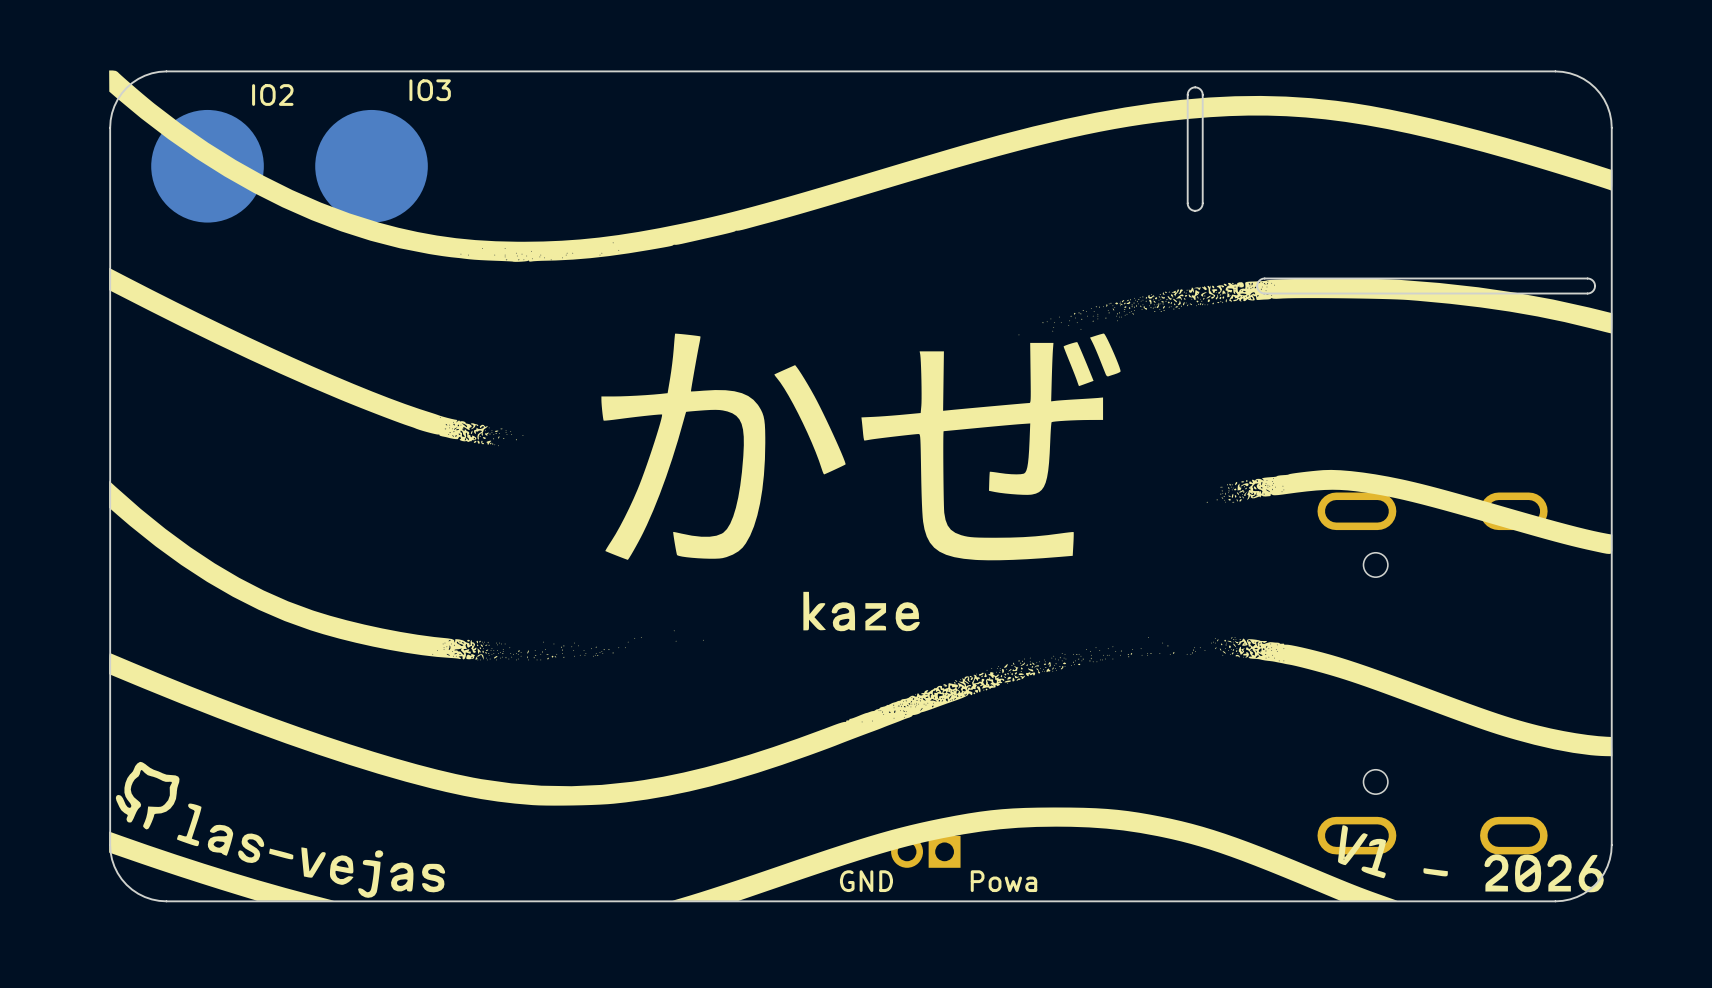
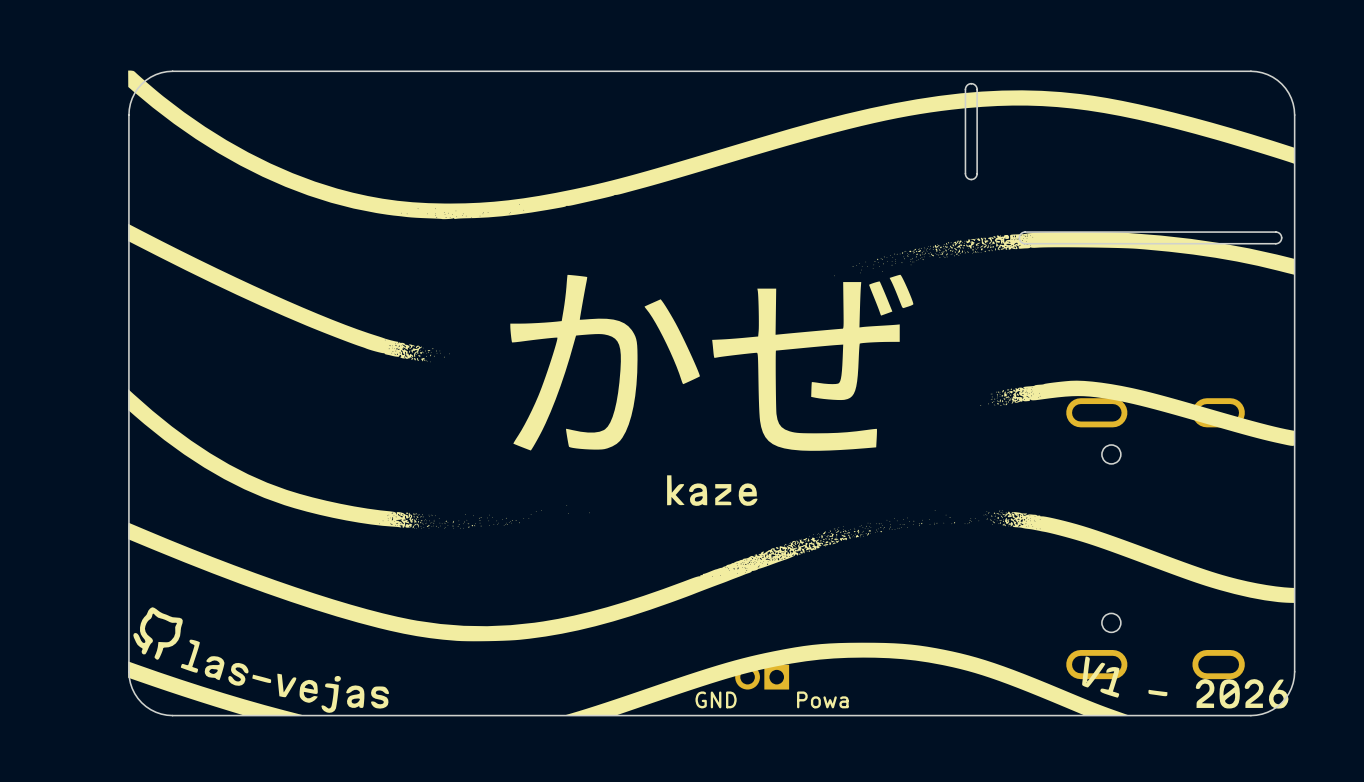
IO2: (207, 166) -> none
IO3: (371, 166) -> none

